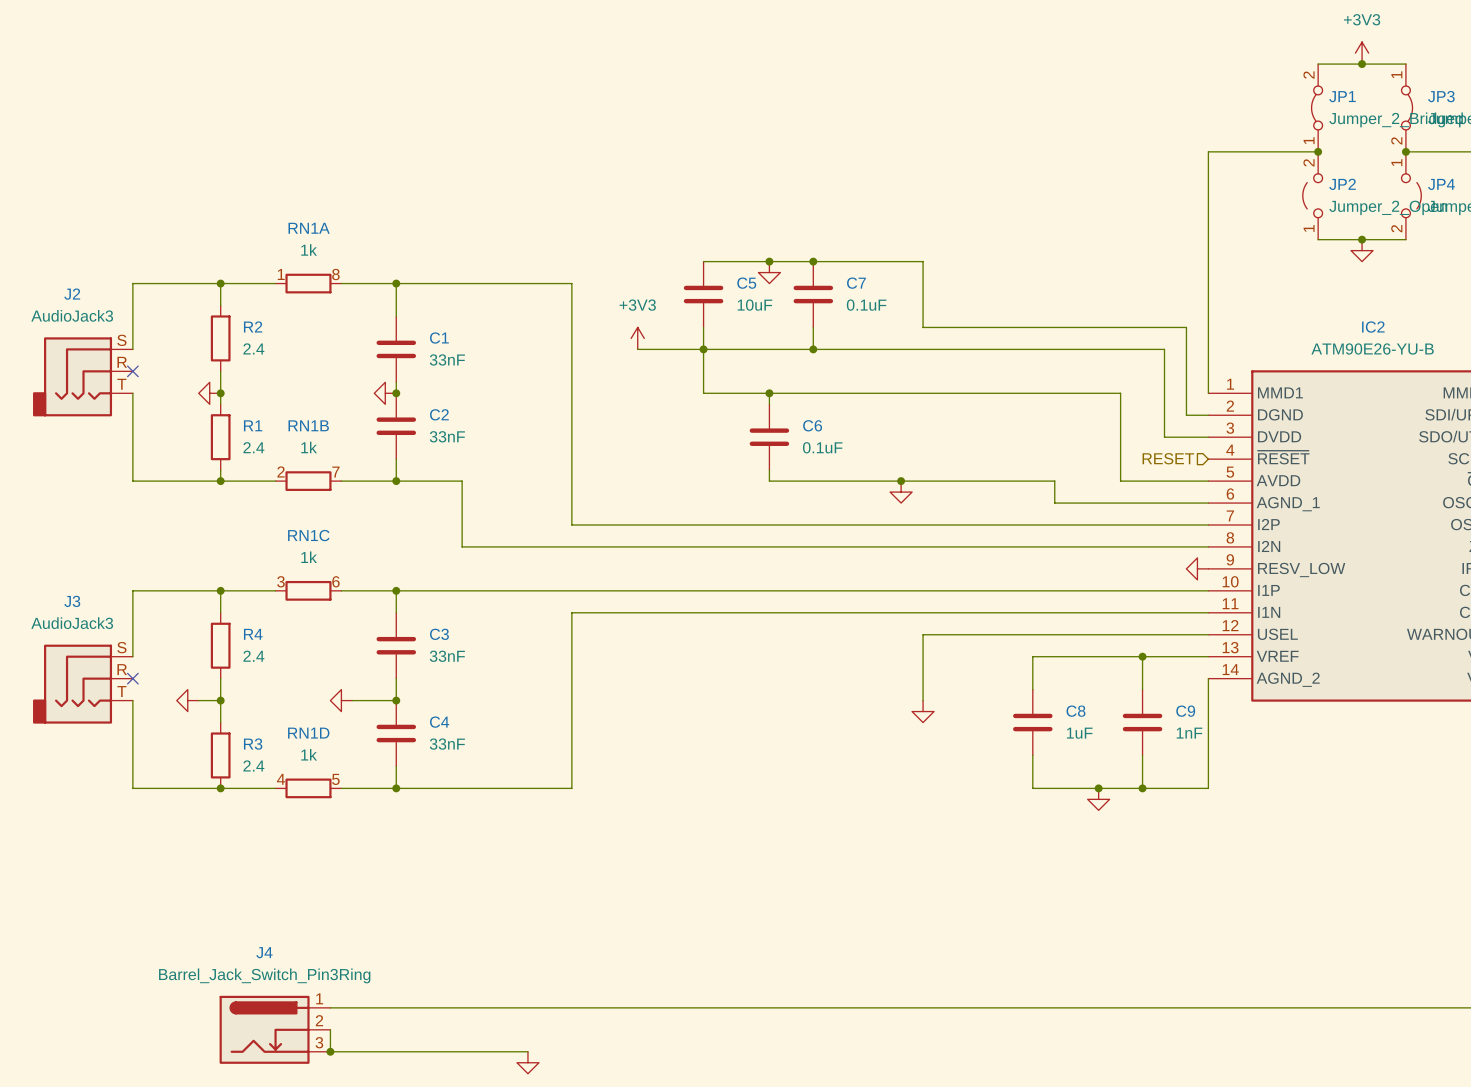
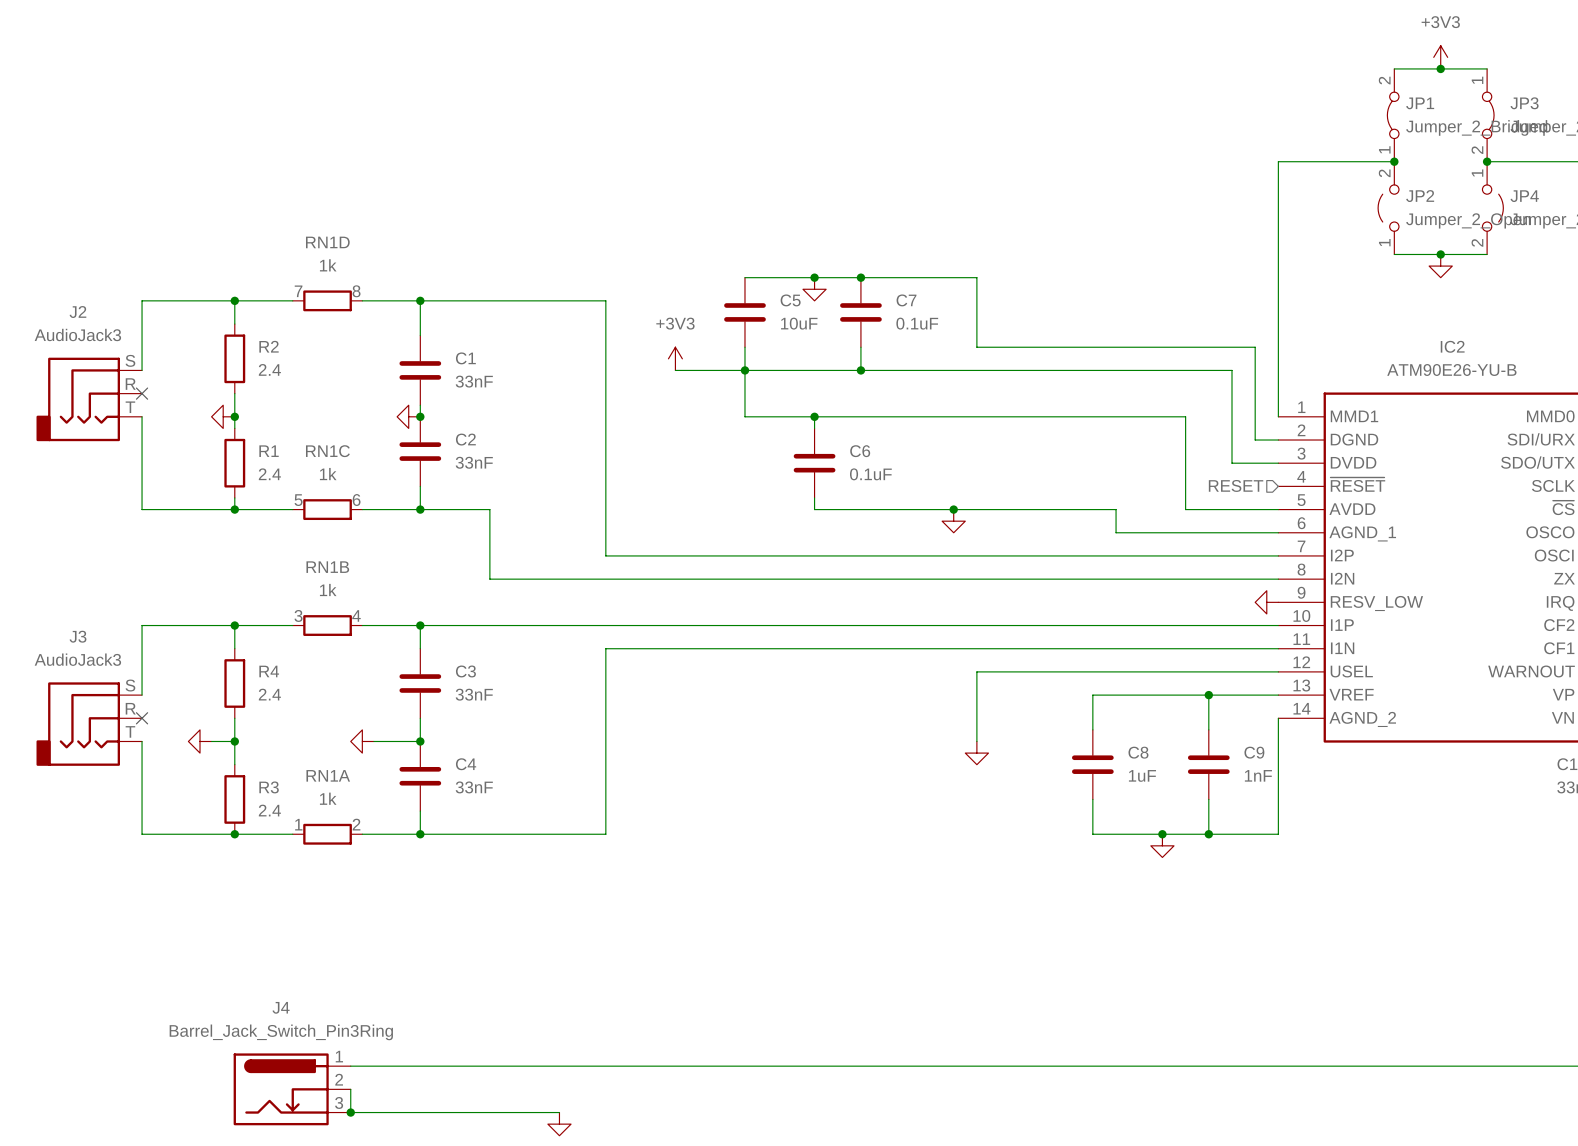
RN1A pin number: 8 (335, 274) -> 2 (356, 824)
RN1A position: (308, 283) -> (327, 834)
RN1B pin number: 2 (281, 471) -> 3 (298, 615)
RN1B pin number: 7 (335, 472) -> 4 (356, 615)
RN1B position: (308, 481) -> (327, 625)
RN1C pin number: 3 (280, 581) -> 5 (298, 500)
RN1C position: (308, 590) -> (327, 509)
RN1D pin number: 4 (280, 779) -> 7 (298, 291)
RN1D pin number: 5 (335, 779) -> 8 (356, 291)
RN1D position: (308, 788) -> (327, 300)

